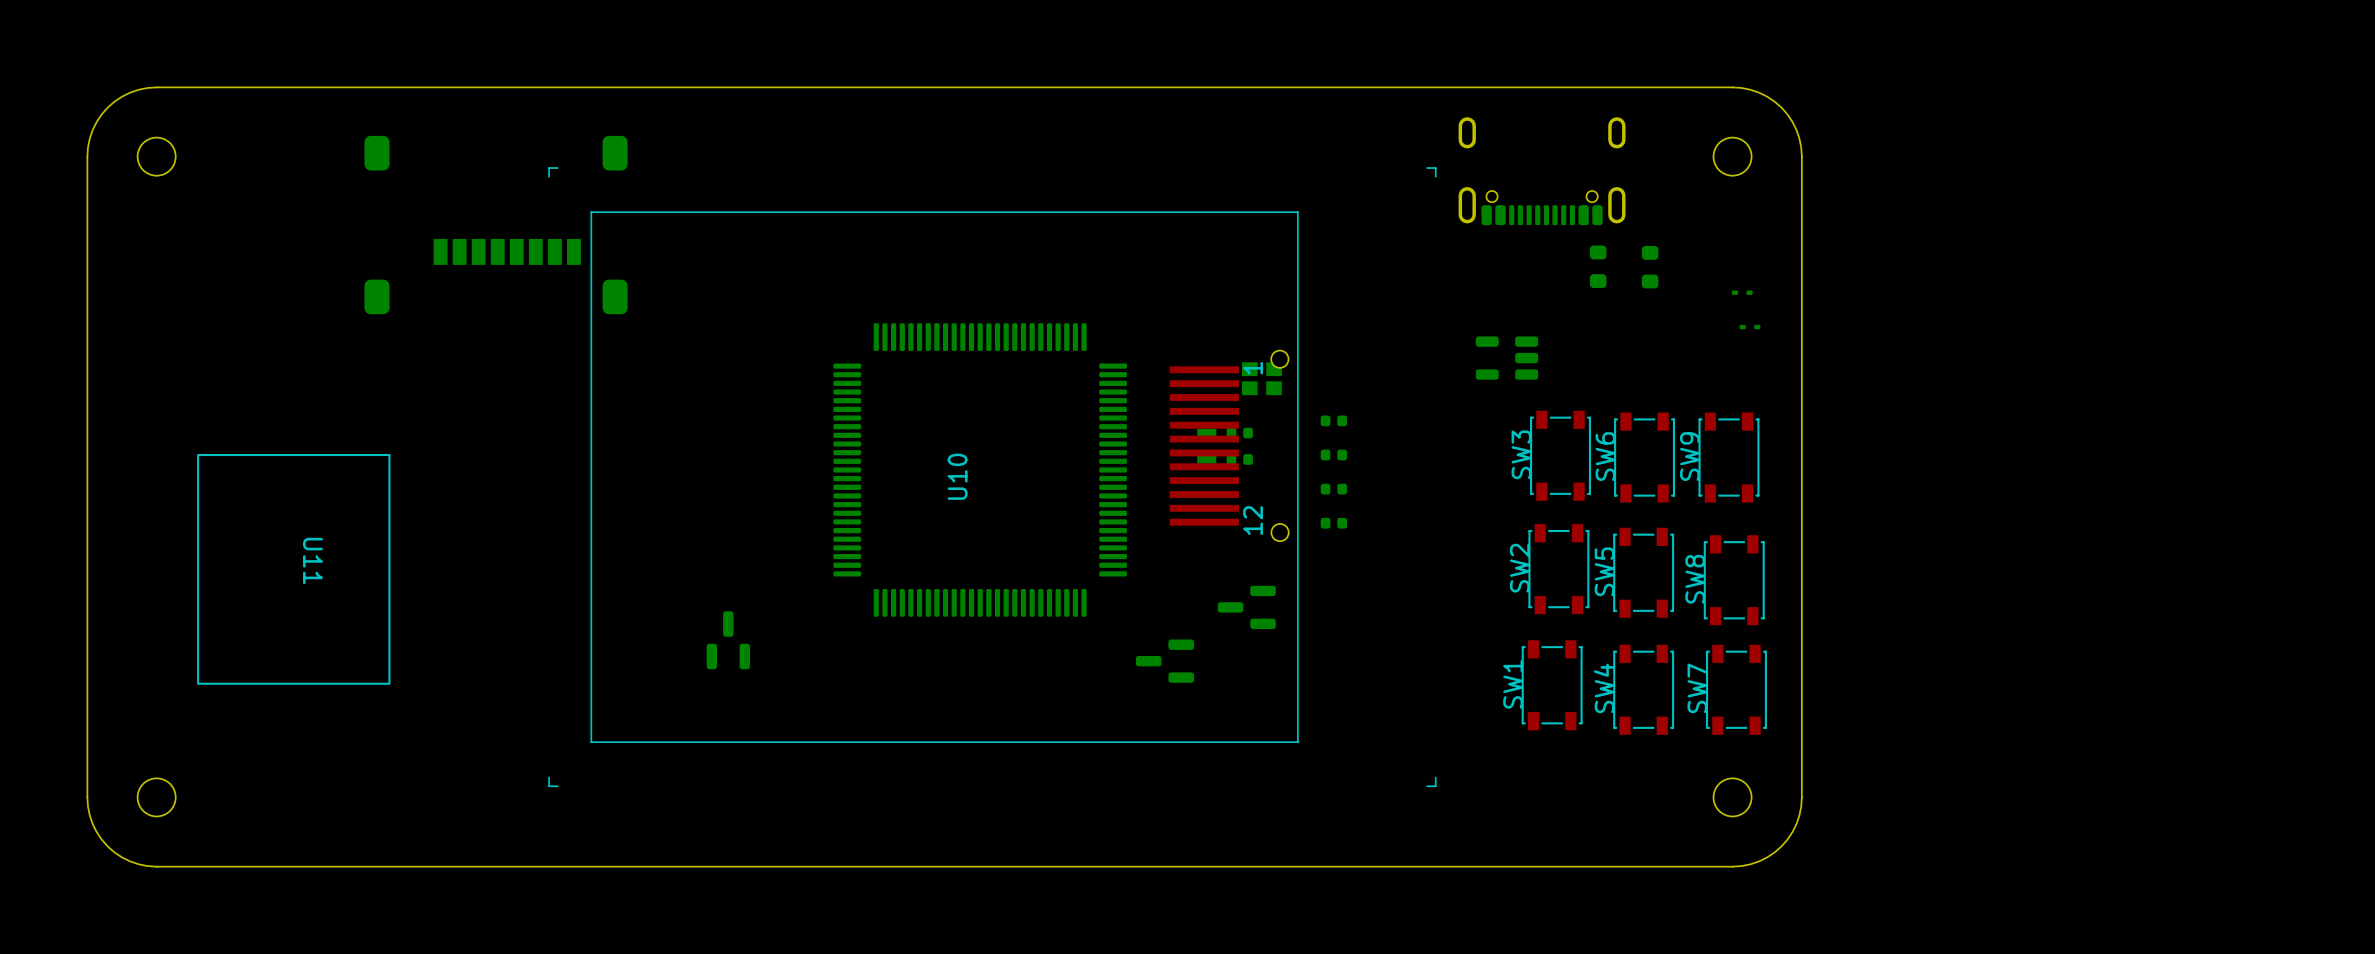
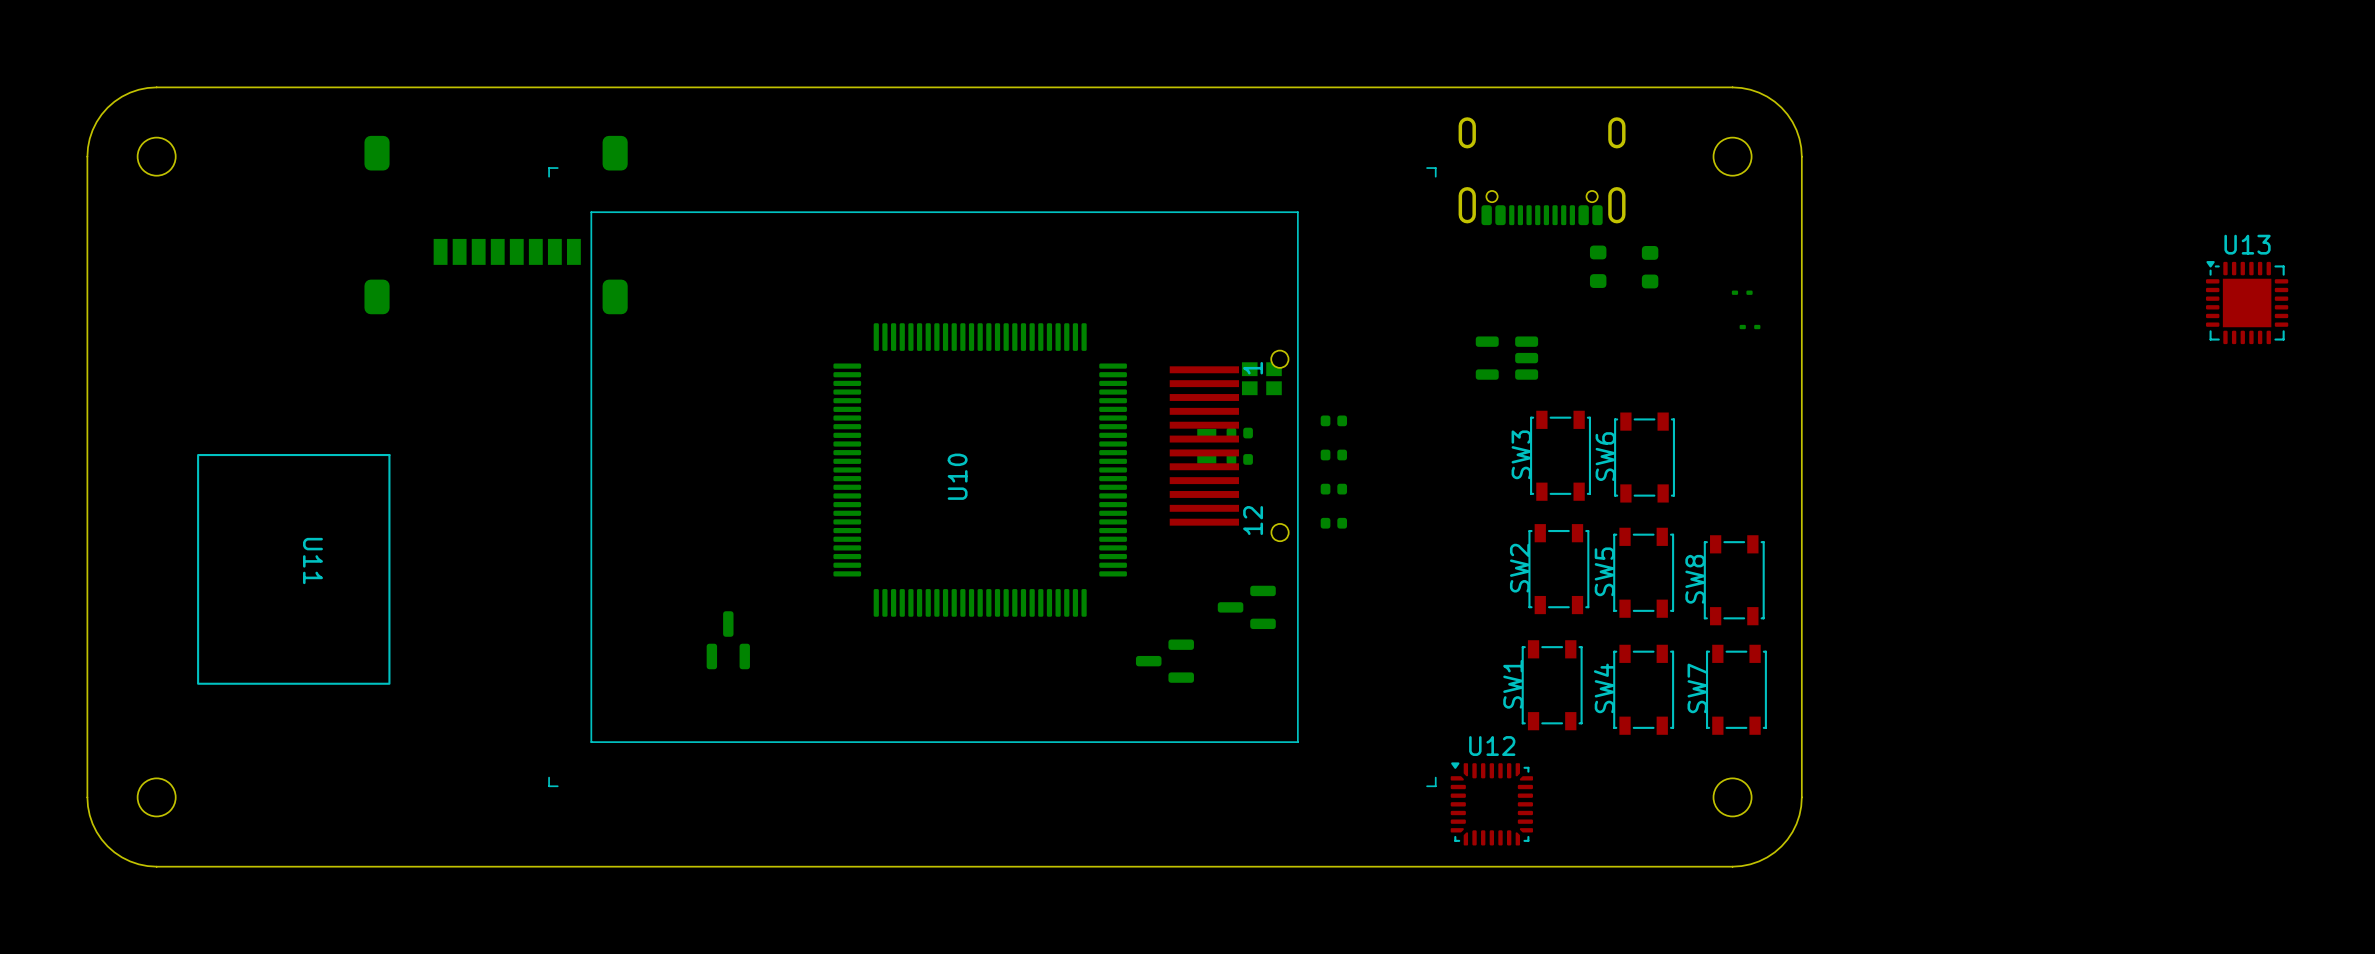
U13: none -> (2247, 302)
SW9: (1728, 457) -> none
U12: none -> (1491, 803)

